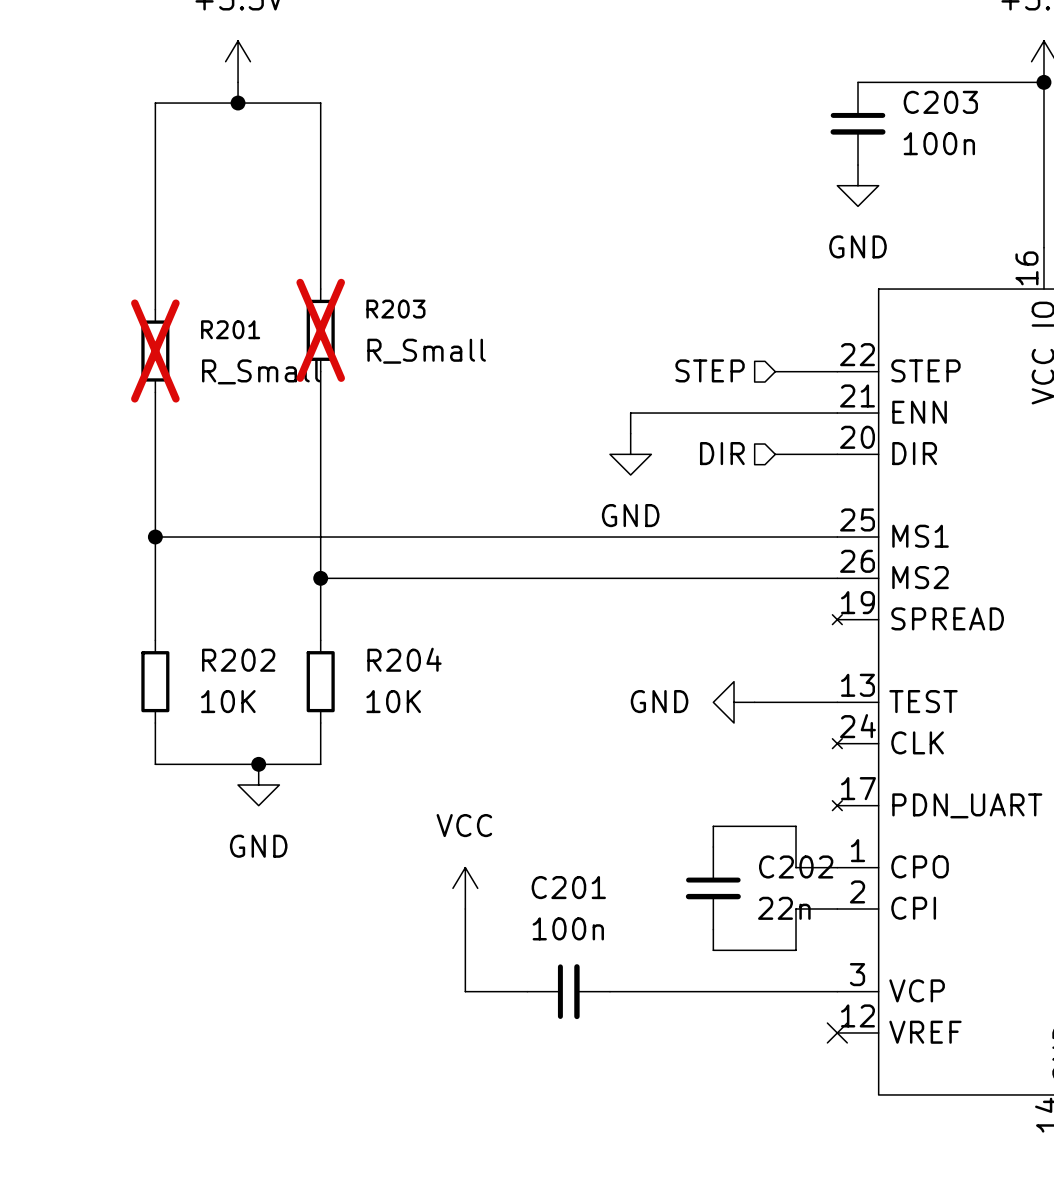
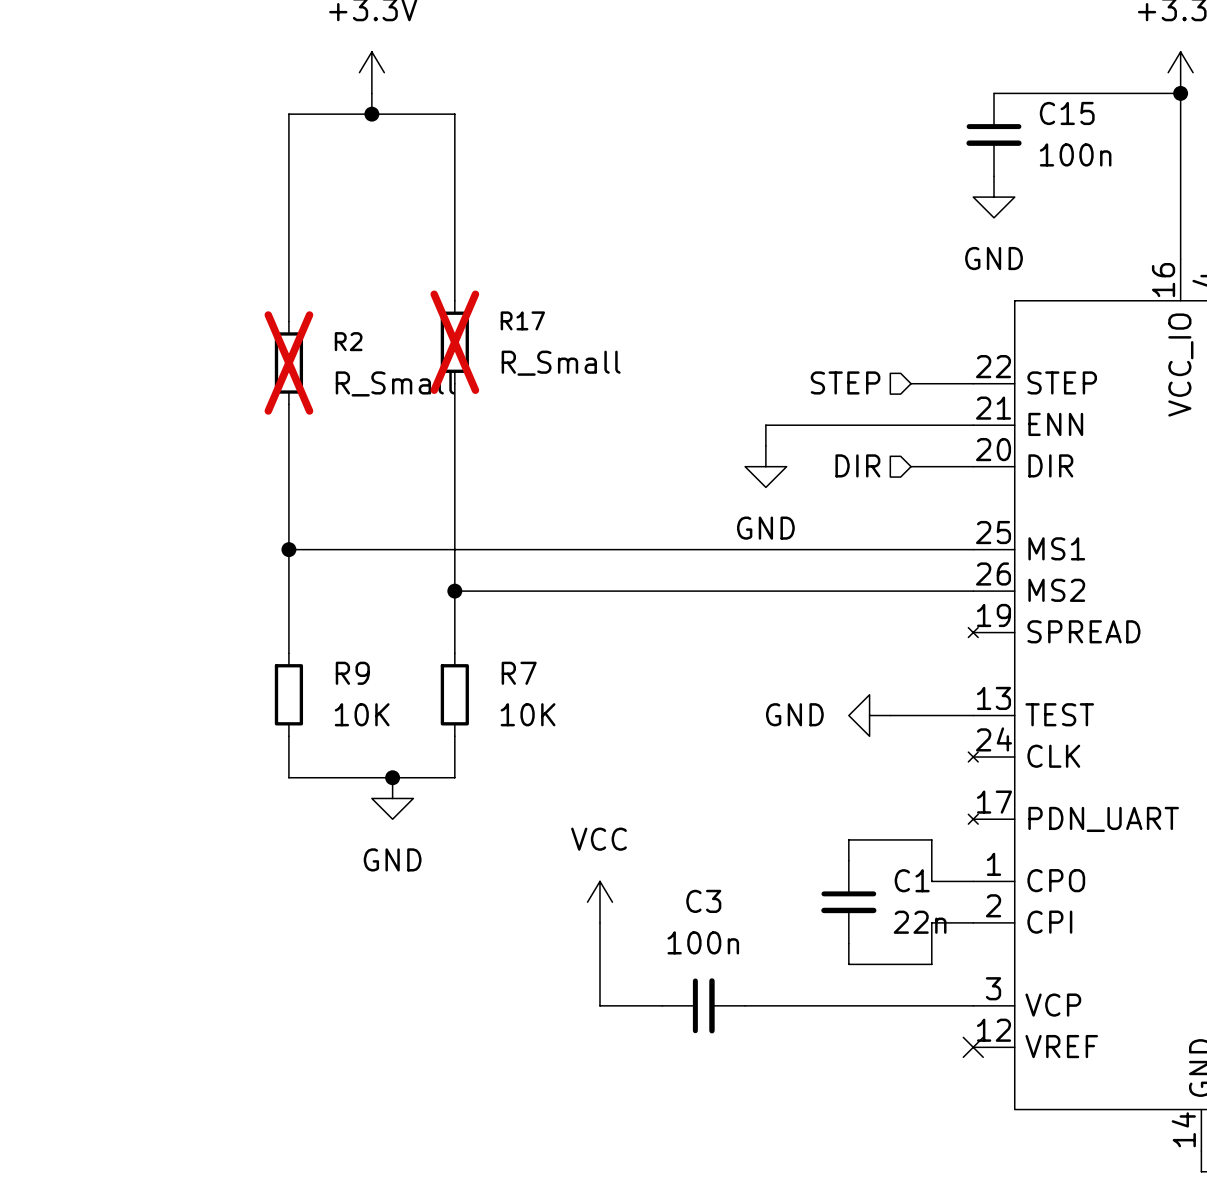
C203 name: C203 (940, 102) -> C15 (1067, 113)
R203 name: R203 (395, 309) -> R17 (522, 320)
R201 name: R201 (230, 329) -> R2 (348, 341)
R204 name: R204 (404, 659) -> R7 (519, 673)
R202 name: R202 (238, 660) -> R9 (352, 673)
C202 name: C202 (796, 866) -> C1 (912, 880)
C201 name: C201 (568, 887) -> C3 (703, 901)

